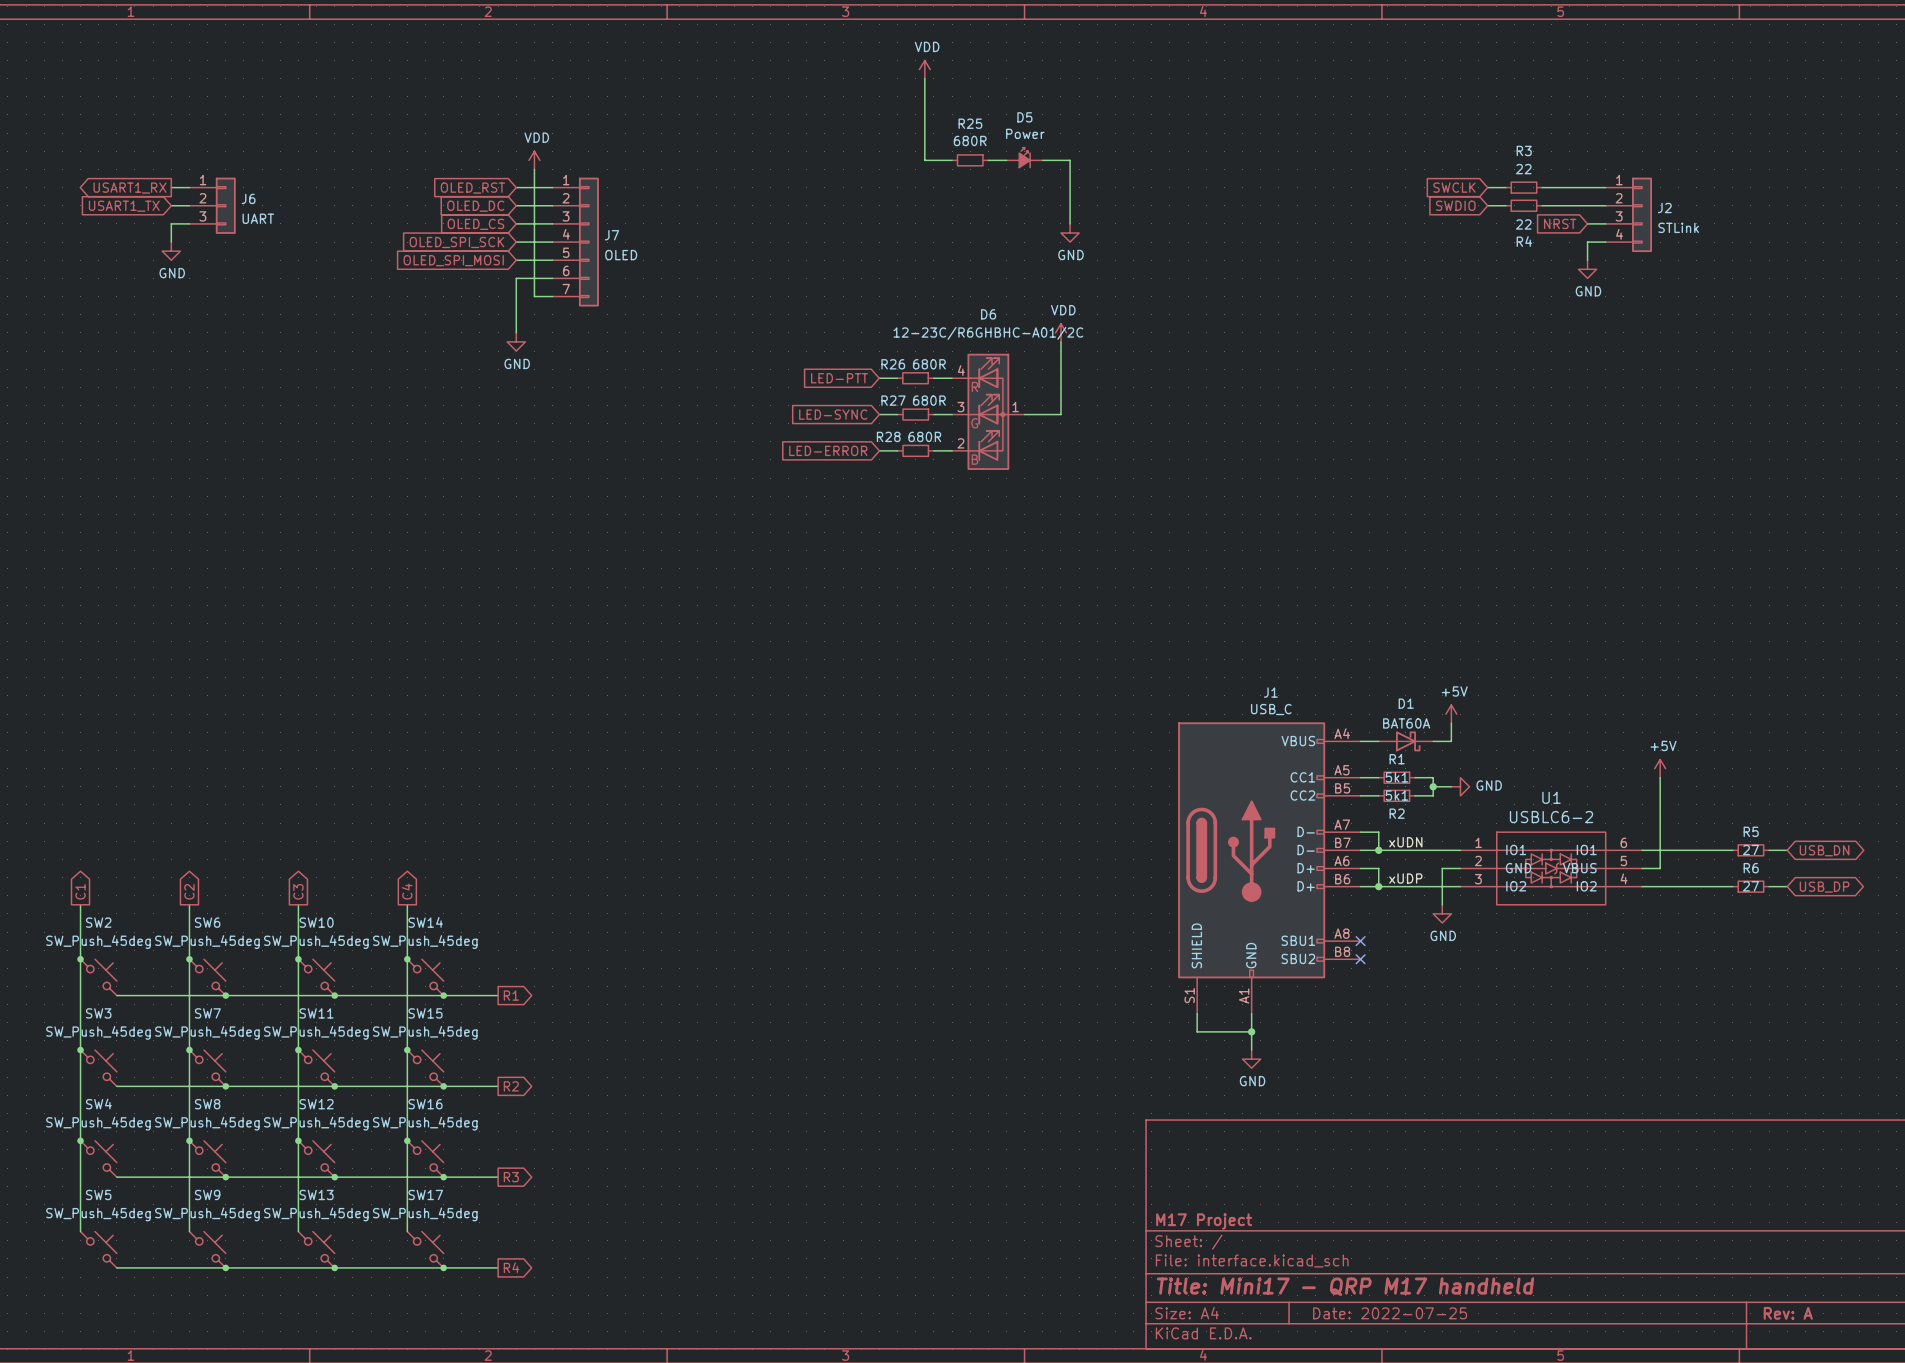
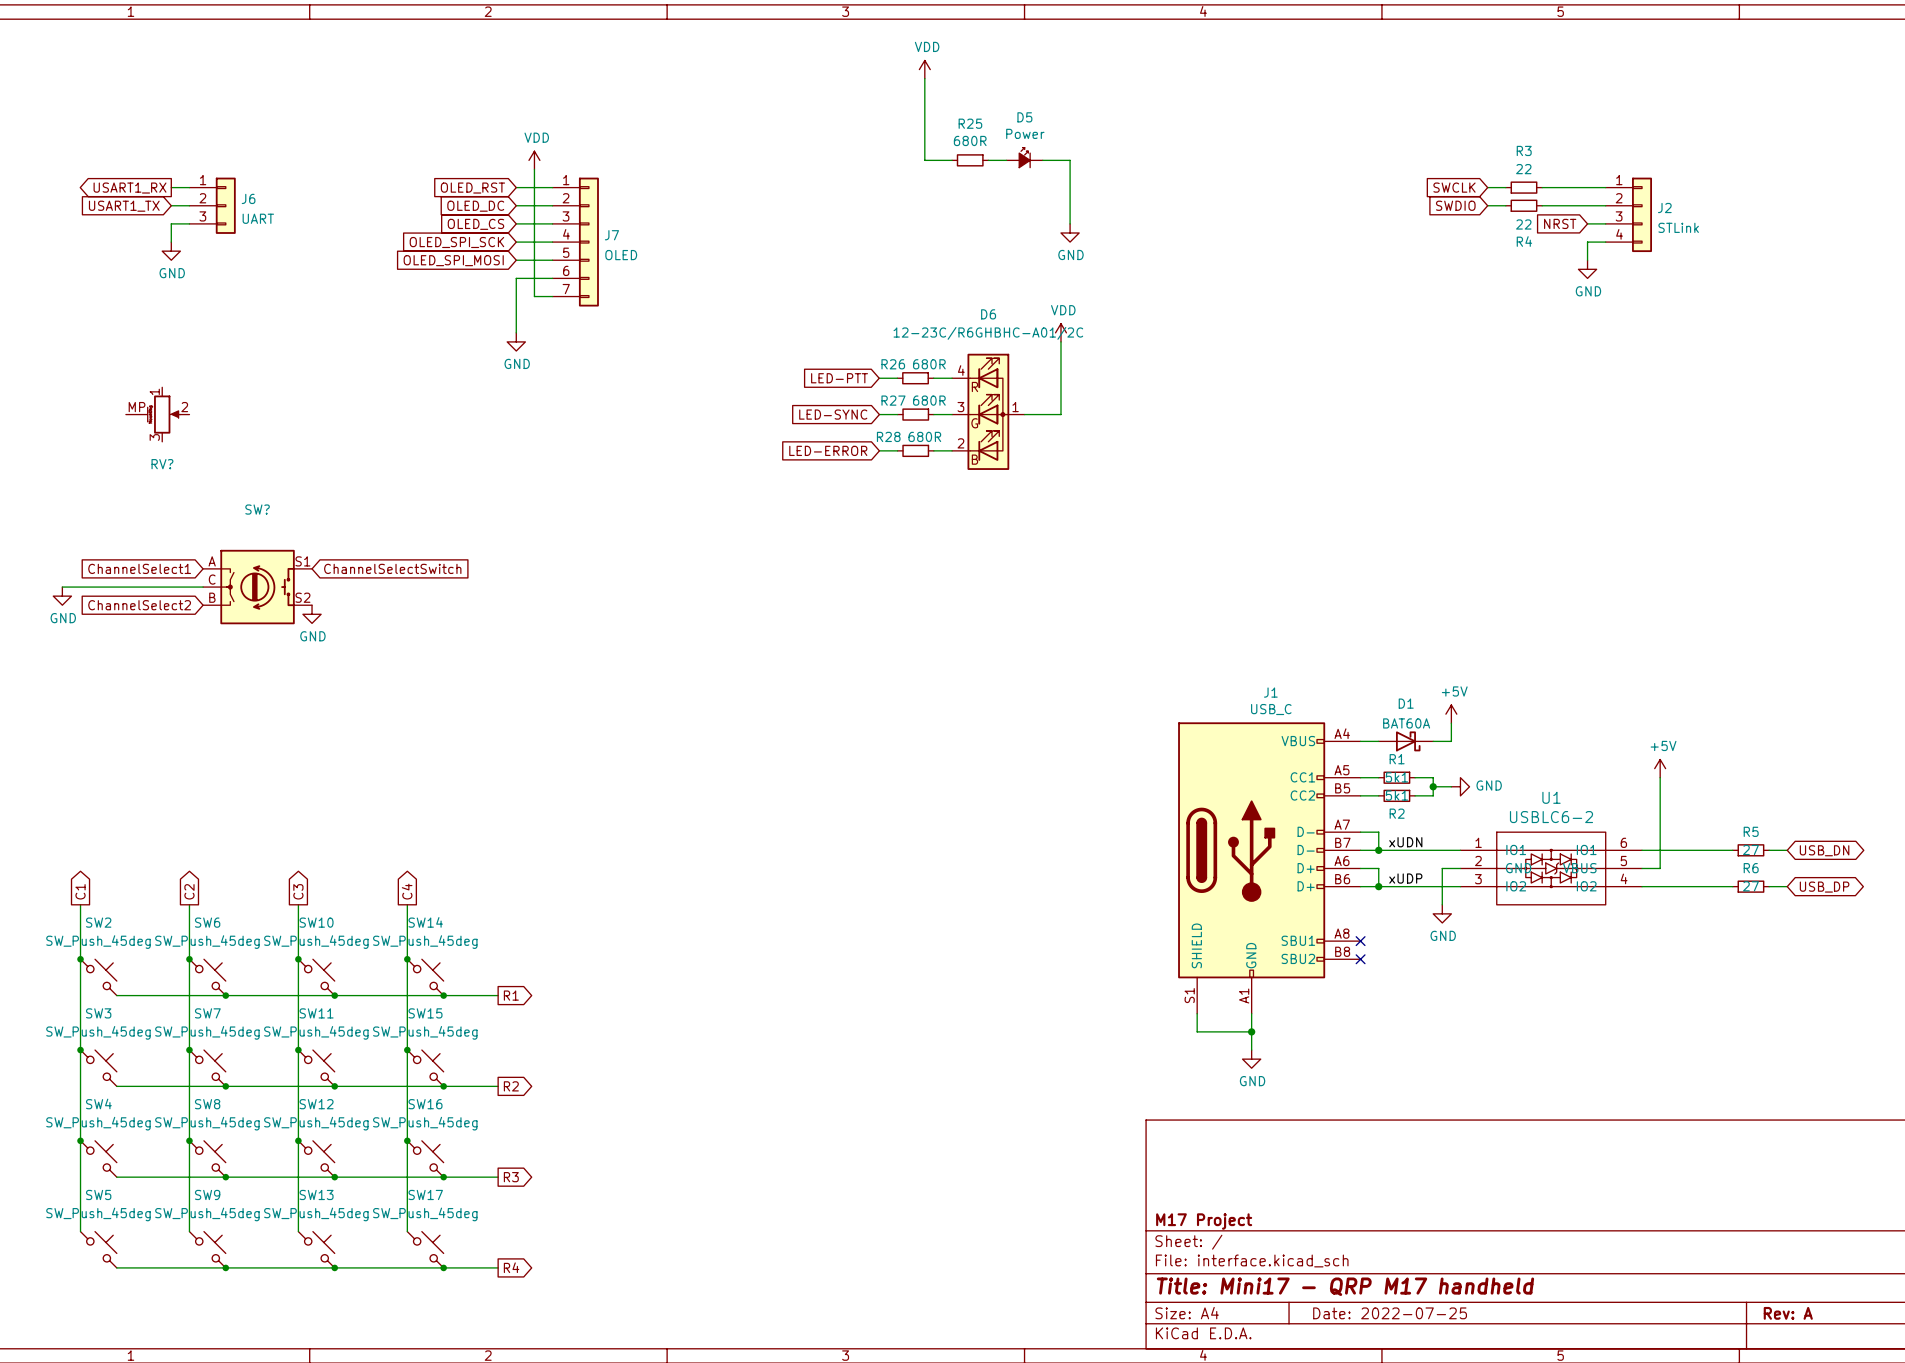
RV?: none -> (157, 414)
global label: none -> ChannelSelect1 (139, 568)
global label: none -> ChannelSelectSwitch (392, 568)
wire: none -> (62, 587) (203, 587)
SW?: none -> (257, 587)
power symbol: none -> GND (62, 596)
global label: none -> ChannelSelect2 (139, 605)
power symbol: none -> GND (312, 614)

